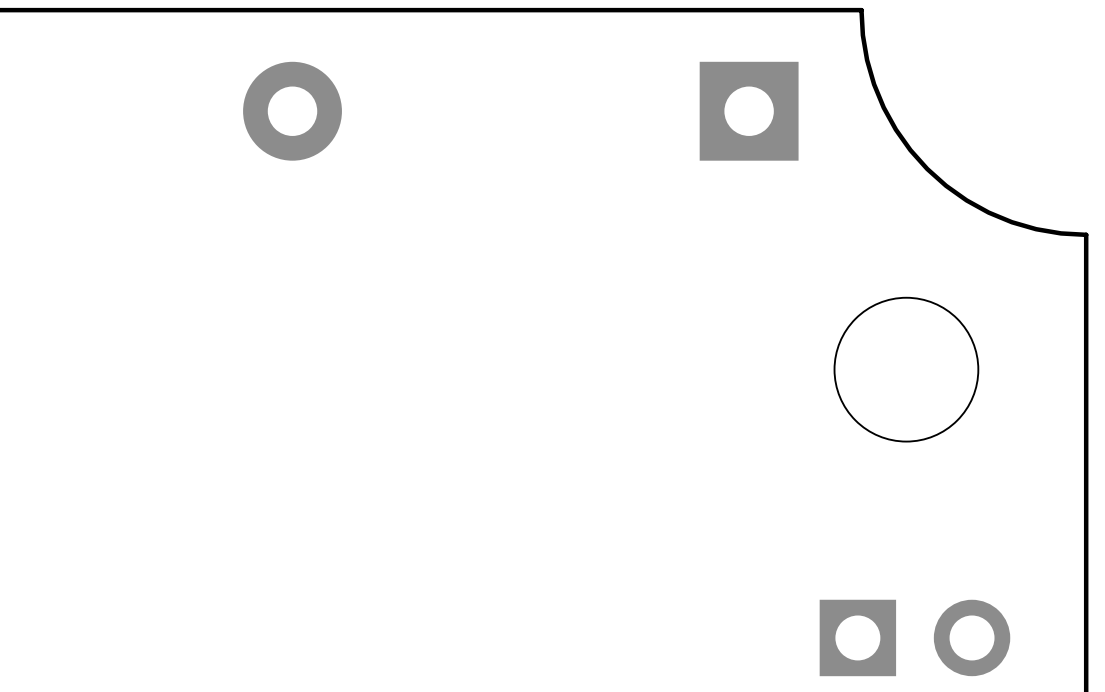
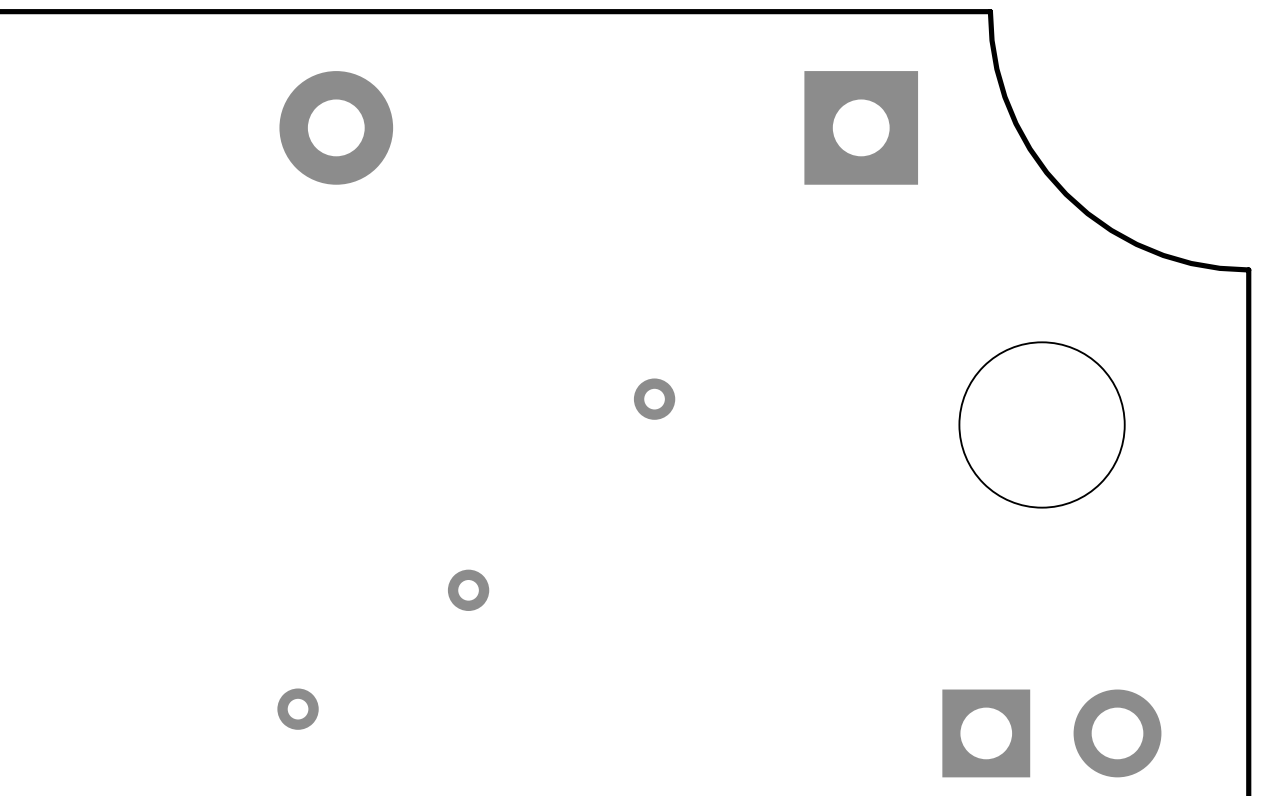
via: none -> (654, 399)
via: none -> (468, 590)
via: none -> (298, 709)

